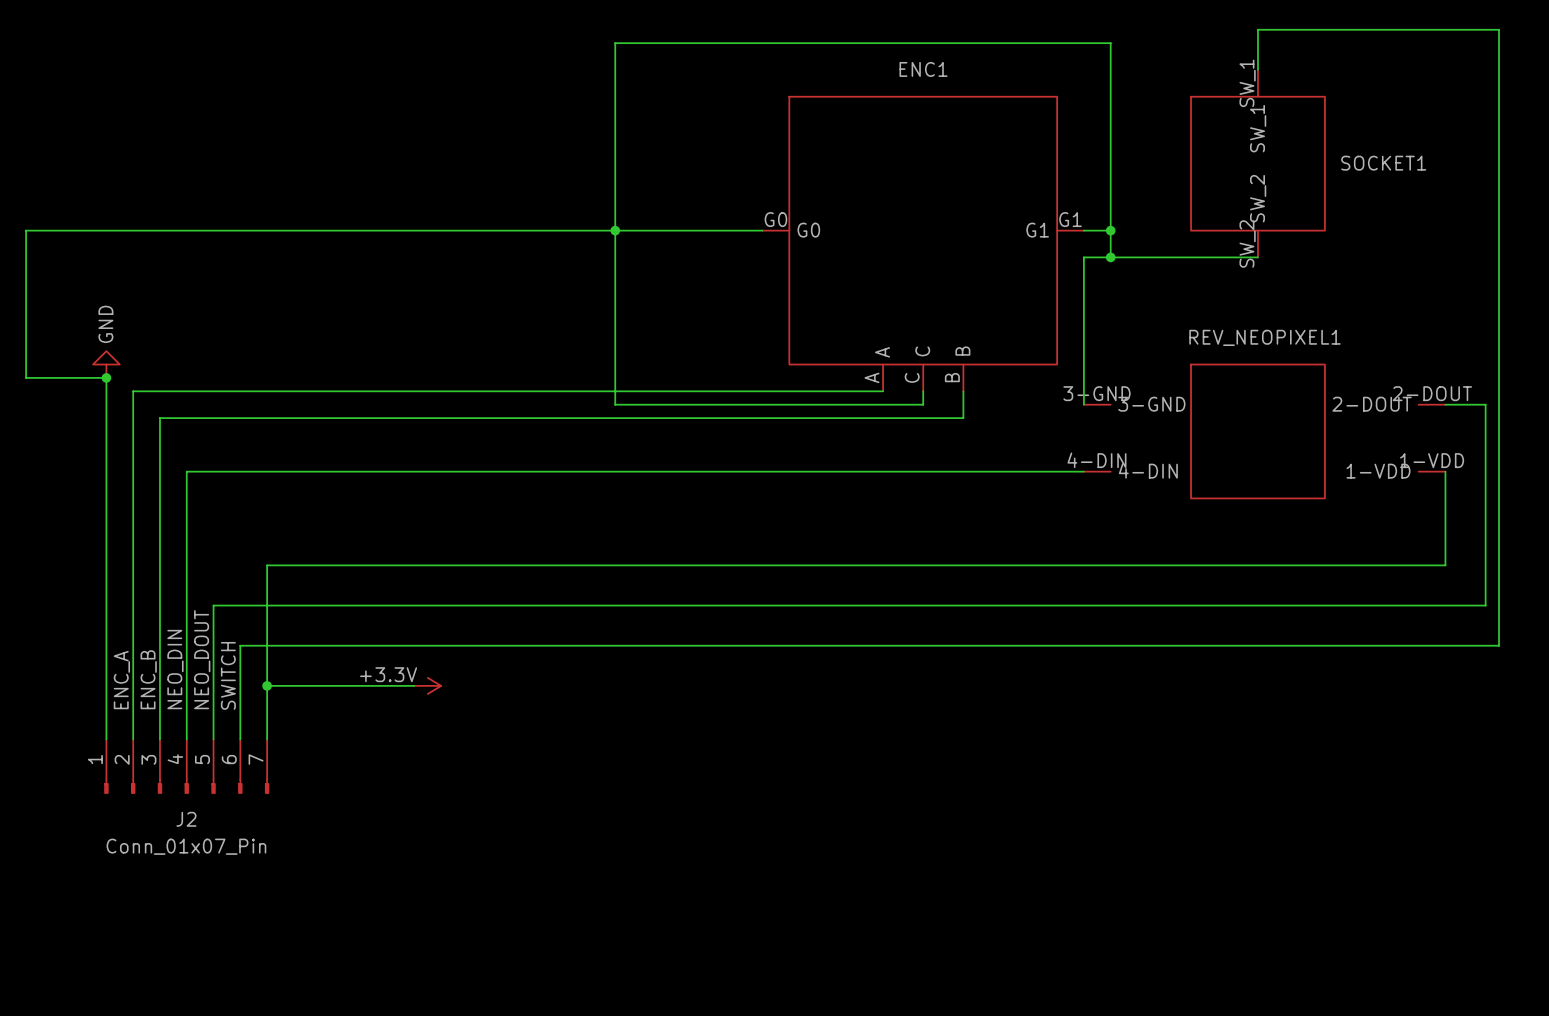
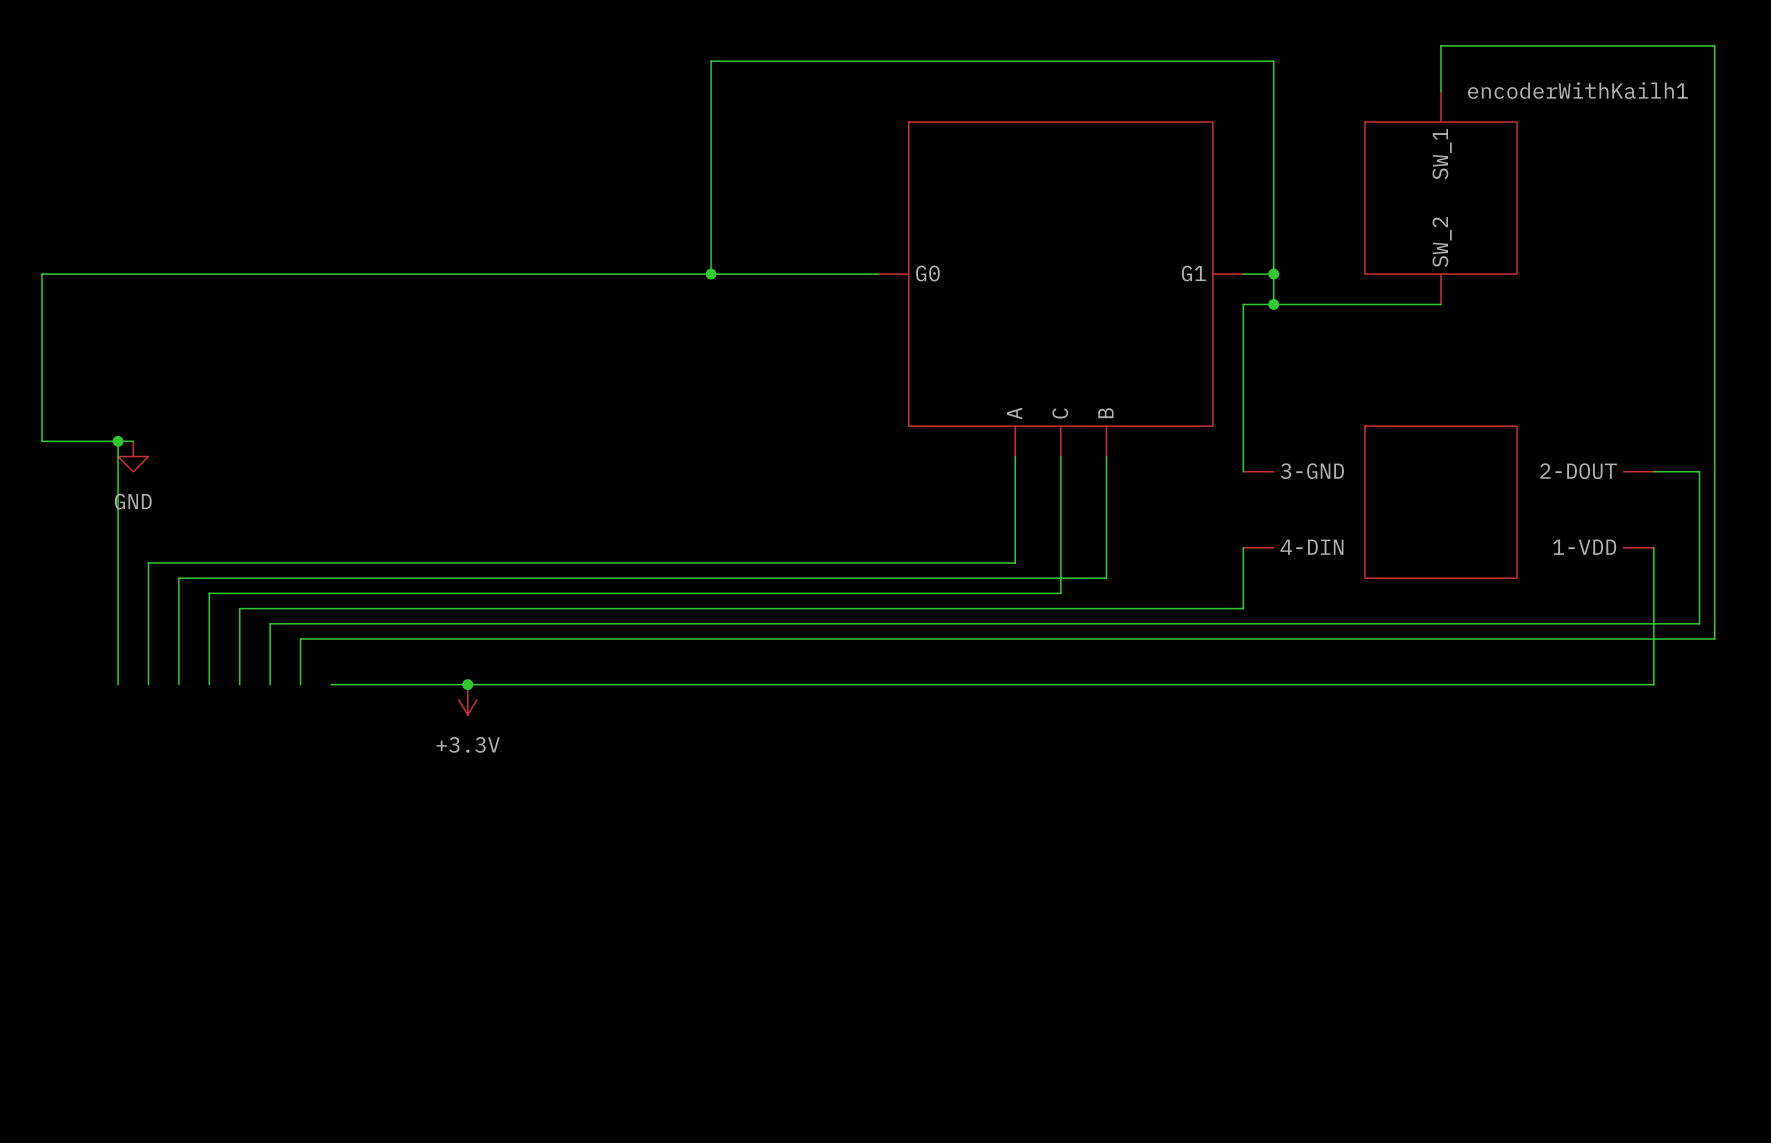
SOCKET1: (1257, 163) -> none
wire: (615, 230) (615, 404) (923, 404) -> (209, 684) (209, 593) (1060, 593) (1060, 471)
ENC1: (923, 244) -> none
encoderWithKailh1: none -> (1266, 334)
power symbol rotation: 0° (106, 364) -> 180° (133, 456)
power symbol position: GND (106, 364) -> GND (133, 456)
wire: none -> (118, 441) (118, 684)
wire: (106, 377) (106, 739) -> none
junction position: (106, 377) -> (118, 441)
wire: (883, 391) (133, 391) (133, 739) -> (1015, 456) (1015, 562) (148, 562) (148, 684)
wire: (963, 418) (159, 418) (159, 739) -> (1106, 486) (1106, 578) (178, 578) (178, 684)
REV_NEOPIXEL1: (1264, 431) -> none
wire: (1083, 471) (186, 471) (186, 739) -> (1243, 547) (1243, 608) (239, 608) (239, 684)
wire: (1485, 538) (1485, 605) (213, 605) (213, 739) -> (1699, 623) (270, 623) (270, 684)
wire: (1499, 551) (1499, 645) (240, 645) (240, 739) -> (1714, 639) (300, 639) (300, 684)
wire: (1445, 565) (267, 565) (267, 739) -> (1653, 654) (1653, 684) (330, 684)
junction: none -> (467, 684)
label: NEO_DOUT (202, 659) -> none
label: NEO_DIN (175, 669) -> none
power symbol text position: +3.3V (388, 674) -> +3.3V (468, 744)
label: SWITCH (228, 675) -> none
label: ENC_B (148, 679) -> none
label: ENC_A (121, 680) -> none
wire: (267, 685) (414, 685) -> none
junction: (267, 685) -> none
power symbol rotation: 0° (427, 685) -> 90° clockwise (467, 699)
power symbol position: +3.3V (427, 685) -> +3.3V (467, 699)
J2: Conn_01x07_Pin (186, 766) -> none

